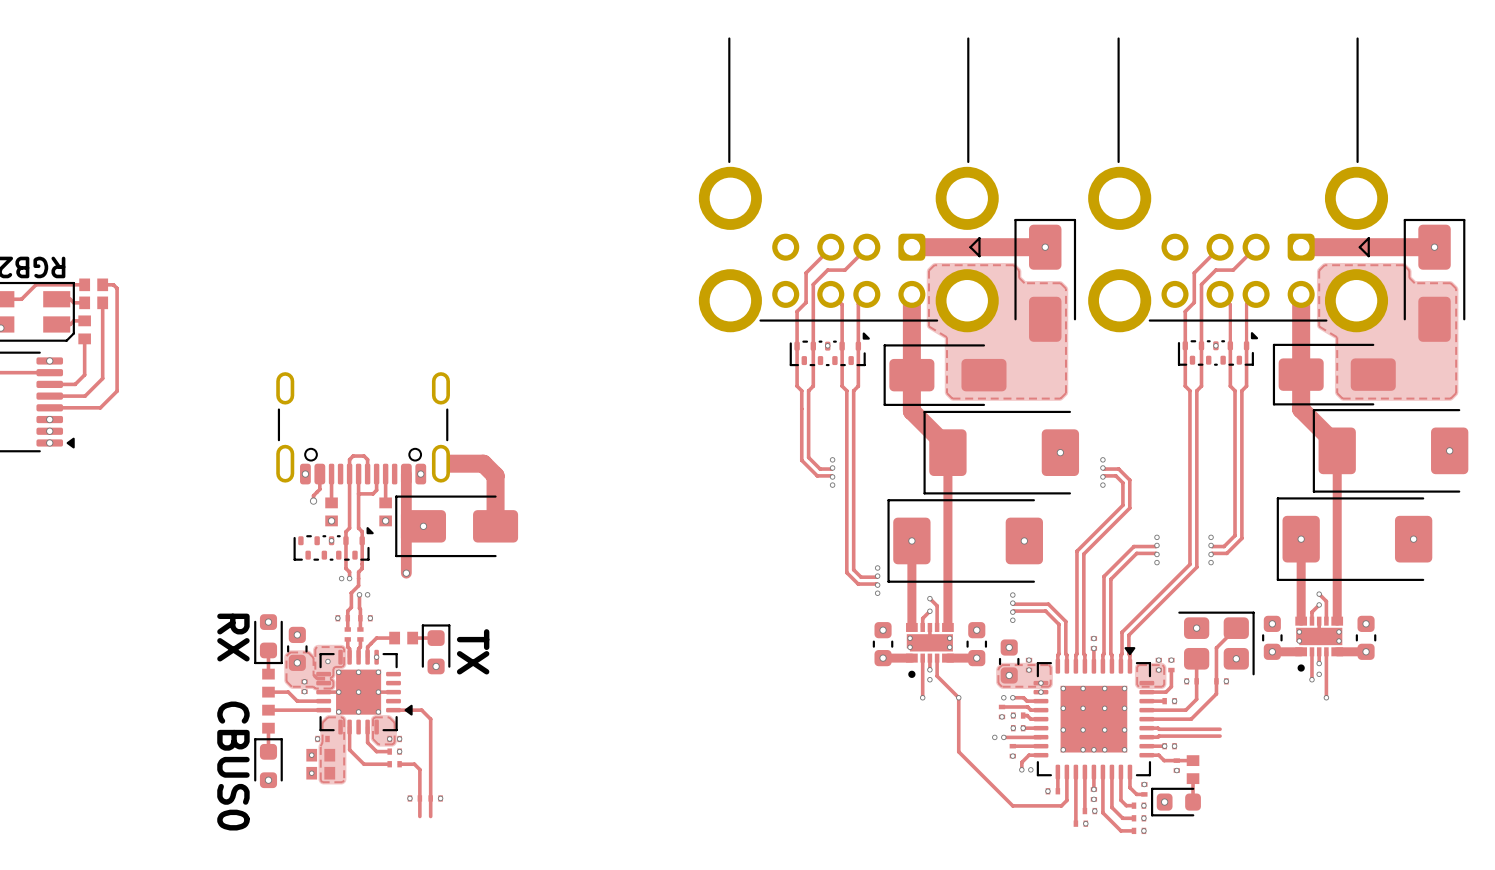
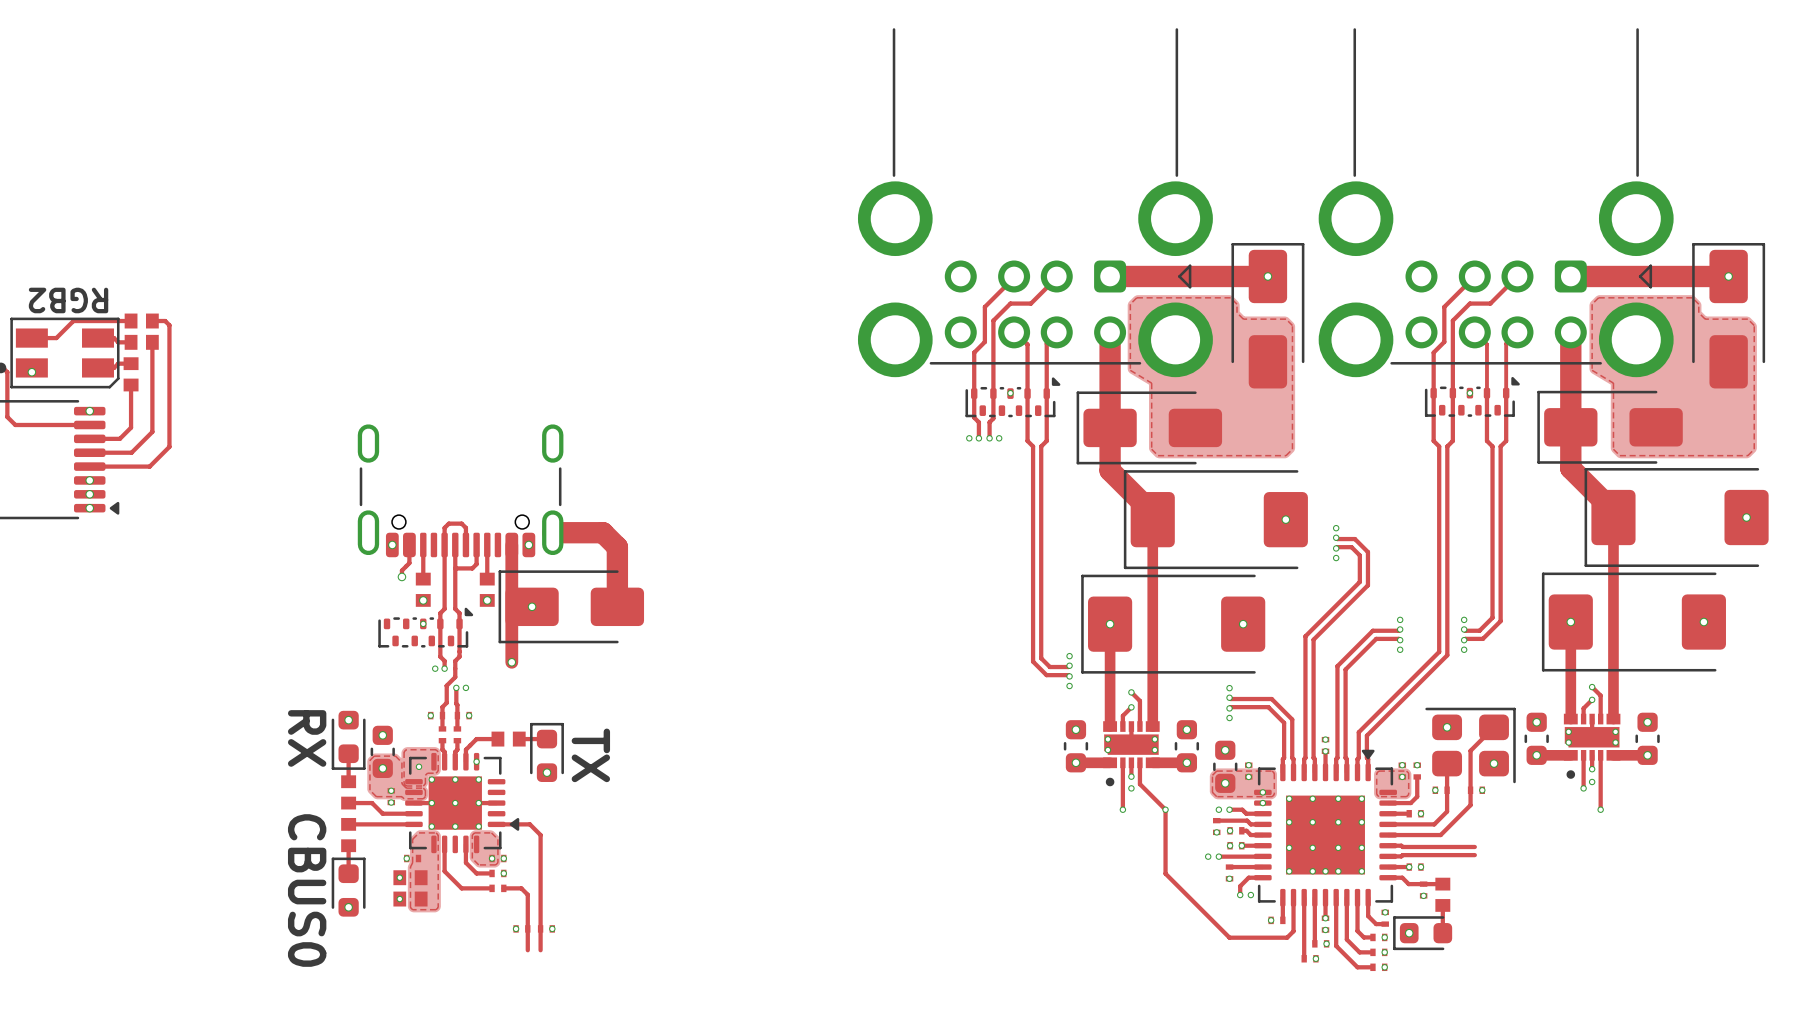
track: (797, 366) (797, 386) (801, 390) (801, 460) (817, 475) (832, 476) -> (974, 417) (978, 422) (978, 438)
track: (813, 367) (813, 386) (808, 390) (808, 457) (820, 469) (832, 467) -> (993, 418) (989, 422) (989, 438)
via: none -> (969, 438)
via: none -> (978, 438)
via: none -> (989, 438)
via: none -> (999, 438)
via: (832, 459) -> none
via: (832, 467) -> none
via: (832, 476) -> none
via: (832, 485) -> none

